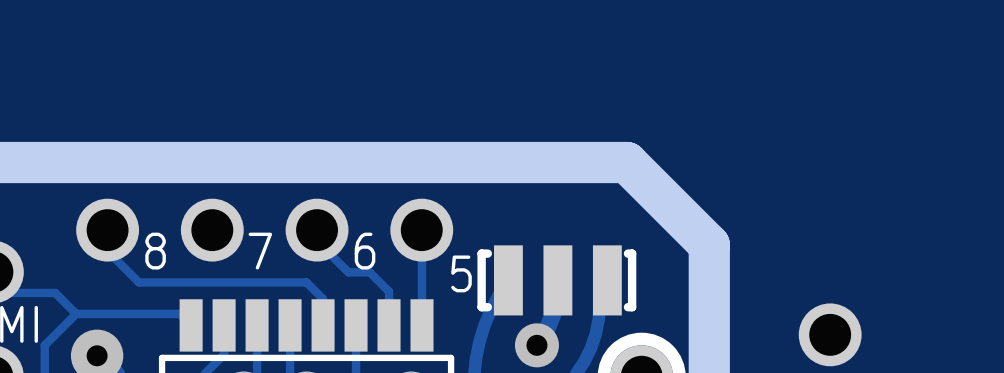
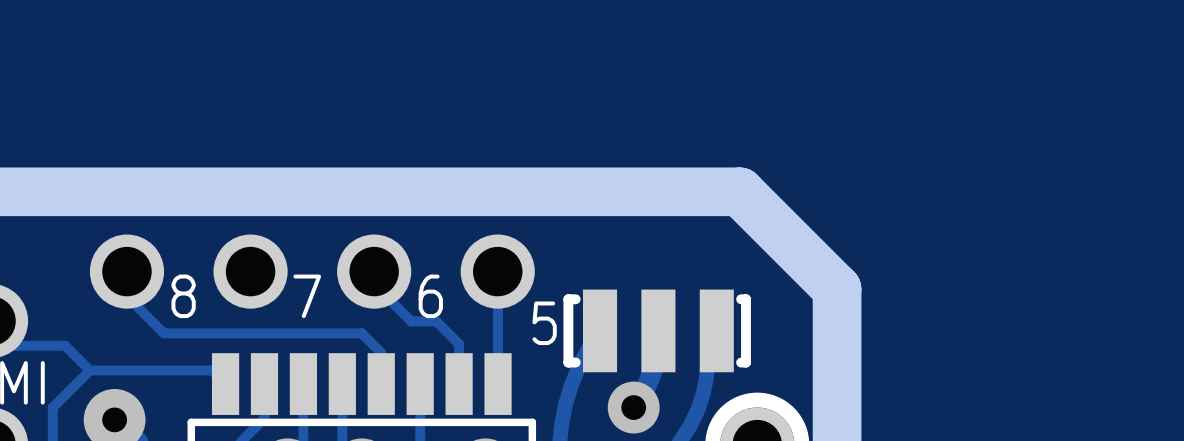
part: (830, 334) -> none

